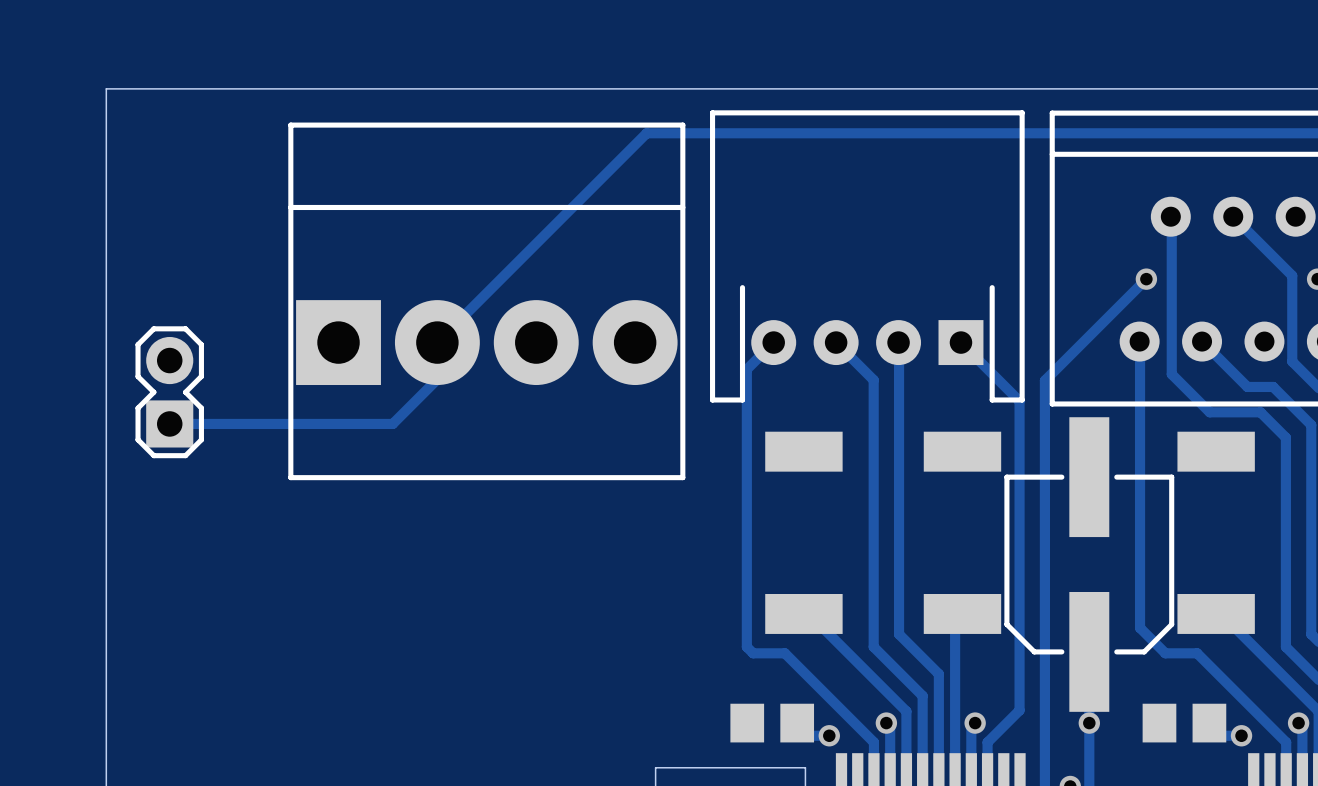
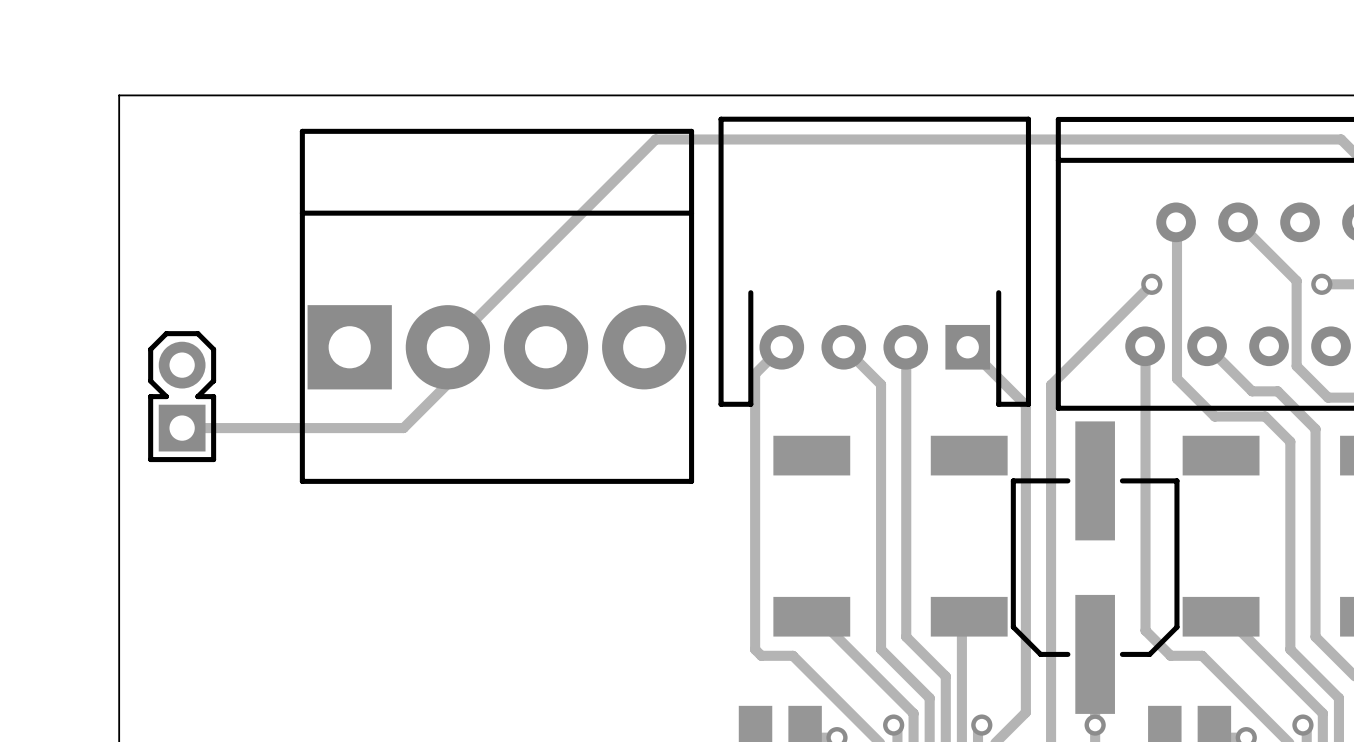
part footprint: [135, 326, 204, 459] -> [148, 331, 217, 463]

